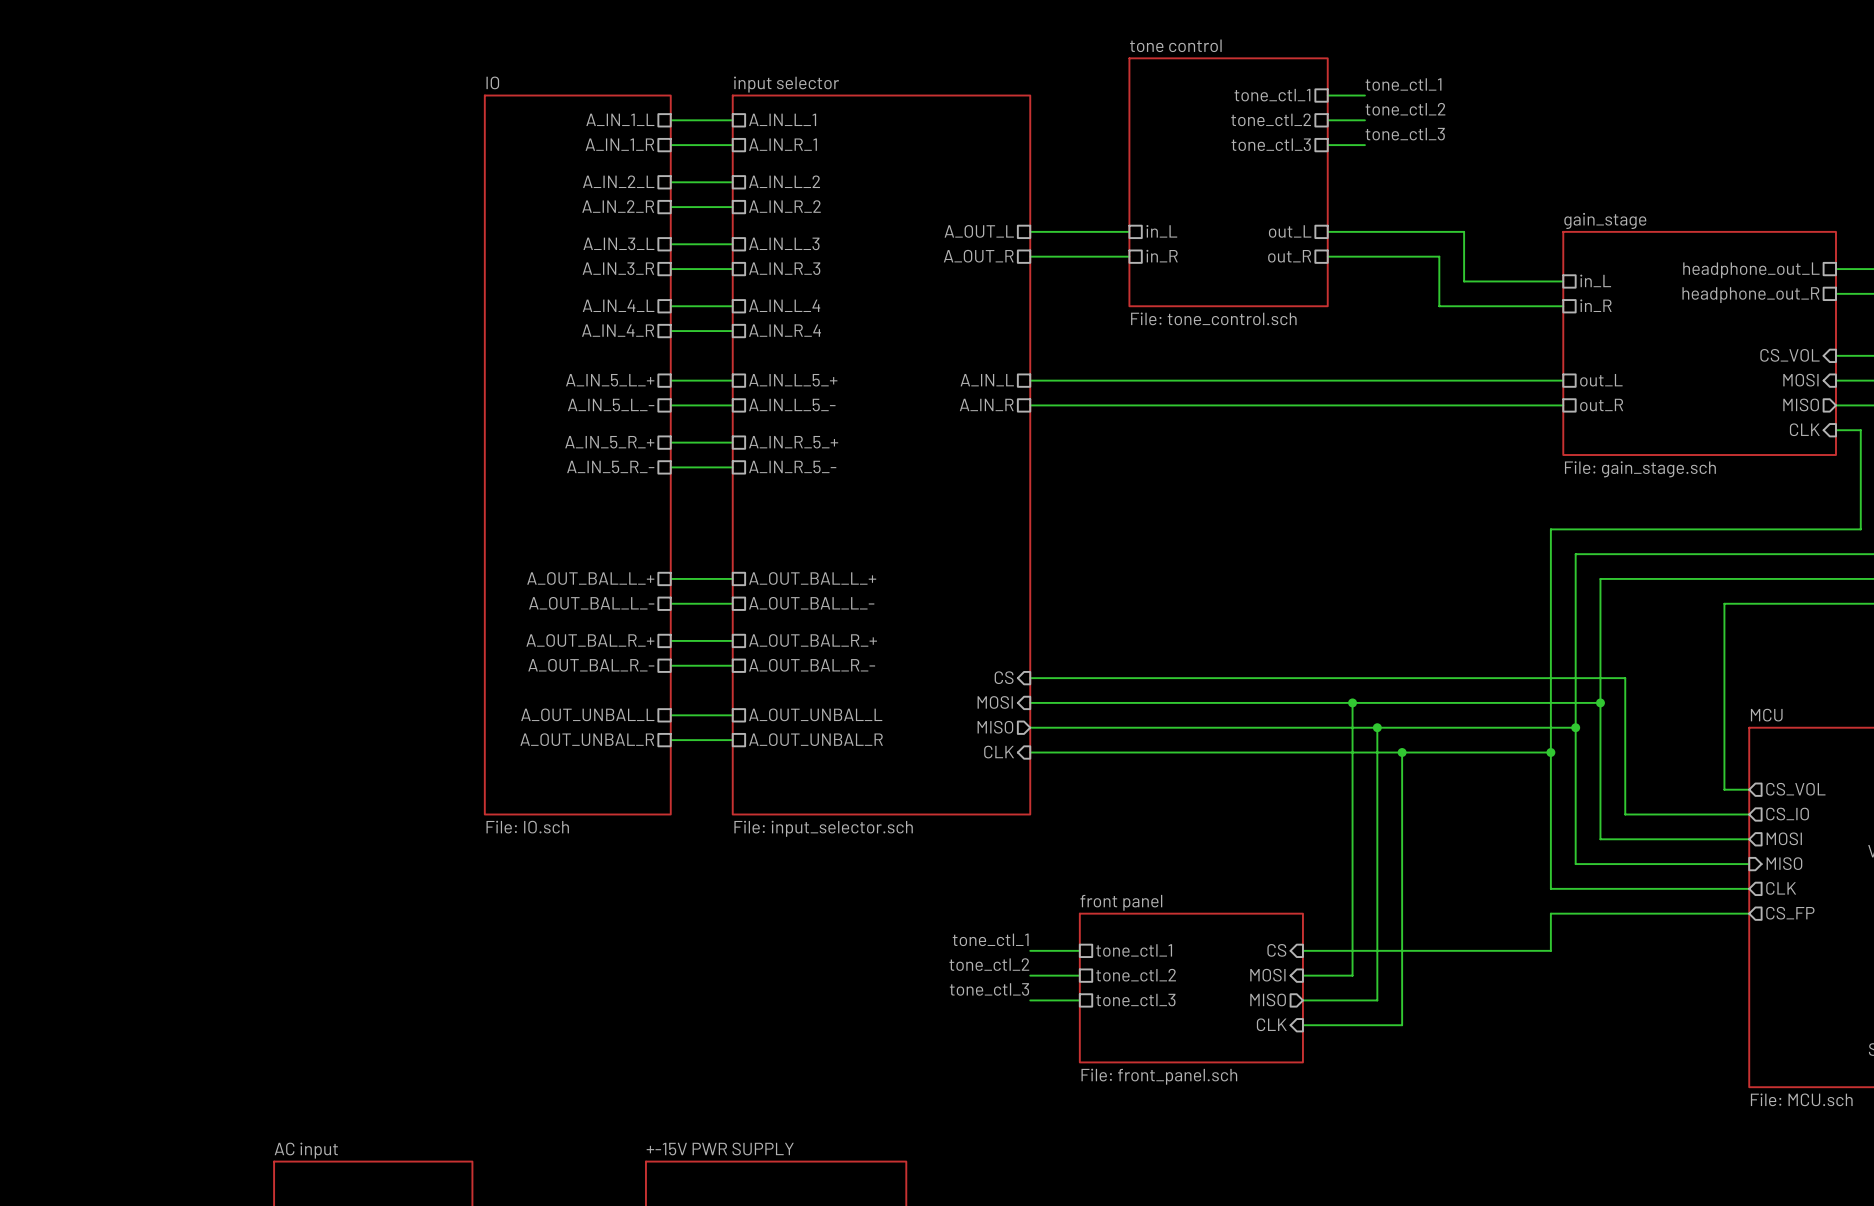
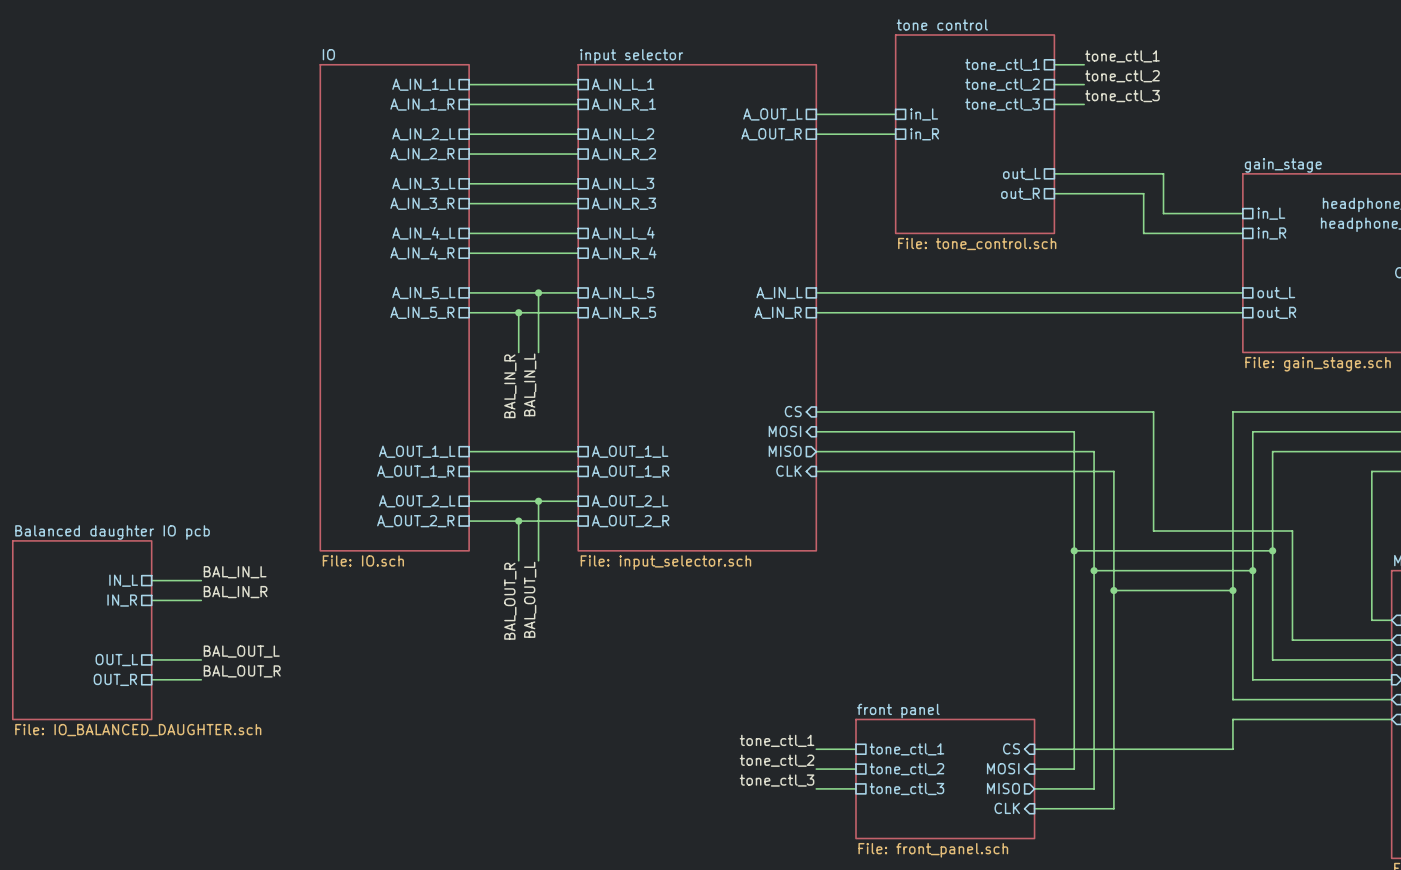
sheet pin position: A_IN_1_L (620, 119) -> A_IN_1_L (423, 84)
wire: none -> (469, 84) (528, 84)
sheet pin position: A_IN_1_R (619, 144) -> A_IN_1_R (422, 104)
wire: none -> (469, 104) (528, 104)
sheet pin position: A_IN_2_L (618, 181) -> A_IN_2_L (423, 134)
wire: none -> (469, 134) (528, 134)
sheet pin position: A_IN_2_R (618, 206) -> A_IN_2_R (422, 154)
wire: none -> (469, 154) (528, 154)
sheet pin position: A_OUT_L (979, 231) -> A_OUT_L (772, 114)
wire: (1030, 231) (1129, 231) -> (816, 114) (895, 114)
sheet pin position: in_L (1161, 231) -> in_L (924, 114)
sheet pin position: A_IN_3_L (618, 243) -> A_IN_3_L (423, 183)
wire: none -> (469, 183) (528, 183)
sheet pin position: A_OUT_R (978, 256) -> A_OUT_R (771, 134)
wire: (1030, 256) (1129, 256) -> (816, 134) (895, 134)
sheet pin position: in_R (1162, 256) -> in_R (924, 134)
sheet pin position: A_IN_3_R (618, 268) -> A_IN_3_R (422, 203)
wire: none -> (469, 203) (528, 203)
sheet pin position: A_IN_4_L (618, 305) -> A_IN_4_L (423, 233)
wire: none -> (469, 233) (528, 233)
sheet pin position: A_IN_4_R (618, 330) -> A_IN_4_R (422, 253)
wire: none -> (469, 253) (528, 253)
sheet pin: none -> A_IN_5_L (423, 293)
wire: none -> (469, 292) (528, 292)
sheet pin: A_IN_5_L_+ (610, 380) -> none
wire: none -> (538, 292) (538, 352)
junction: none -> (538, 292)
sheet pin: A_IN_L_5_+ (793, 380) -> A_IN_L_5 (623, 293)
sheet IO: none -> File: IO.sch (394, 307)
sheet input selector: none -> File: input_selector.sch (697, 307)
sheet pin: none -> A_IN_5_R (422, 312)
wire: none -> (469, 312) (528, 312)
sheet pin: A_IN_5_L_- (611, 405) -> none
wire: none -> (518, 312) (518, 352)
junction: none -> (518, 312)
sheet pin: A_IN_L_5_- (792, 405) -> A_IN_R_5 (623, 312)
sheet pin: A_IN_5_R_+ (609, 442) -> none
wire: (670, 442) (732, 442) -> none
sheet pin: A_IN_R_5_+ (793, 442) -> none
sheet IO: File: IO.sch (577, 455) -> none
sheet input selector: File: input_selector.sch (881, 455) -> none
sheet pin: A_IN_5_R_- (610, 467) -> none
wire: (670, 467) (732, 467) -> none
sheet pin: A_IN_R_5_- (792, 467) -> none
label: none -> BAL_IN_R (510, 386)
label: none -> BAL_IN_L (530, 384)
sheet pin: none -> A_OUT_1_L (417, 451)
sheet pin: A_OUT_BAL_L_+ (590, 578) -> none
wire: none -> (469, 451) (528, 451)
sheet pin: A_OUT_BAL_L_+ (812, 578) -> A_OUT_1_L (630, 451)
sheet pin: none -> A_OUT_1_R (415, 471)
sheet pin: A_OUT_BAL_L_- (591, 603) -> none
wire: none -> (469, 471) (528, 471)
sheet pin: A_OUT_BAL_L_- (811, 603) -> A_OUT_1_R (630, 471)
sheet pin: none -> A_OUT_2_L (417, 501)
sheet pin: A_OUT_BAL_R_+ (590, 640) -> none
wire: none -> (469, 501) (528, 501)
wire: none -> (538, 501) (538, 560)
junction: none -> (538, 501)
sheet pin: A_OUT_BAL_R_+ (813, 640) -> A_OUT_2_L (630, 501)
sheet pin: none -> A_OUT_2_R (415, 521)
sheet pin: A_OUT_BAL_R_- (591, 665) -> none
wire: none -> (469, 521) (528, 521)
wire: none -> (518, 521) (518, 560)
junction: none -> (518, 521)
sheet pin: A_OUT_BAL_R_- (812, 665) -> A_OUT_2_R (630, 521)
sheet pin position: CS (1004, 677) -> CS (793, 411)
wire: (1030, 678) (1451, 678) -> (816, 411) (1153, 411) (1153, 531)
sheet pin position: MOSI (995, 702) -> MOSI (784, 431)
wire: (1030, 702) (1352, 702) -> (816, 431) (1074, 431) (1074, 550)
sheet pin: A_OUT_UNBAL_L (587, 714) -> none
sheet pin: A_OUT_UNBAL_L (815, 714) -> none
wire: (670, 715) (732, 715) -> none
sheet pin position: MISO (995, 727) -> MISO (785, 451)
wire: (1030, 727) (1377, 727) -> (816, 451) (1094, 451) (1094, 570)
label: none -> BAL_IN_L (235, 572)
sheet pin: none -> IN_L (123, 580)
sheet pin: A_OUT_UNBAL_R (587, 739) -> none
sheet pin: A_OUT_UNBAL_R (815, 739) -> none
wire: none -> (151, 580) (201, 580)
wire: (670, 740) (732, 740) -> none
sheet pin position: CLK (999, 752) -> CLK (788, 471)
wire: (1030, 752) (1402, 752) -> (816, 471) (1113, 471) (1113, 590)
label: none -> BAL_IN_R (235, 592)
label: none -> BAL_OUT_L (530, 599)
label: none -> BAL_OUT_R (510, 601)
sheet pin: none -> IN_R (122, 600)
wire: none -> (151, 600) (201, 600)
sheet Balanced daughter IO pcb: none -> File: IO_BALANCED_DAUGHTER.sch (82, 630)
label: none -> BAL_OUT_L (241, 651)
sheet pin: none -> OUT_L (116, 660)
wire: none -> (151, 659) (201, 659)
label: none -> BAL_OUT_R (242, 671)
sheet pin: none -> OUT_R (115, 679)
wire: none -> (151, 679) (201, 679)

